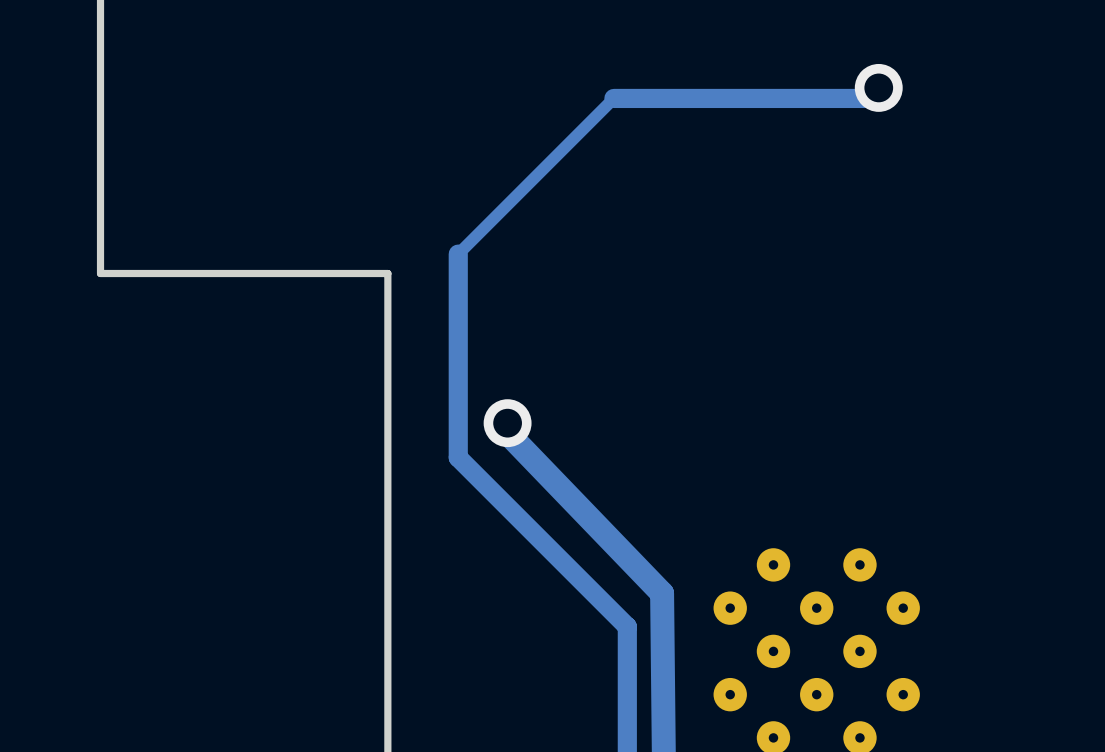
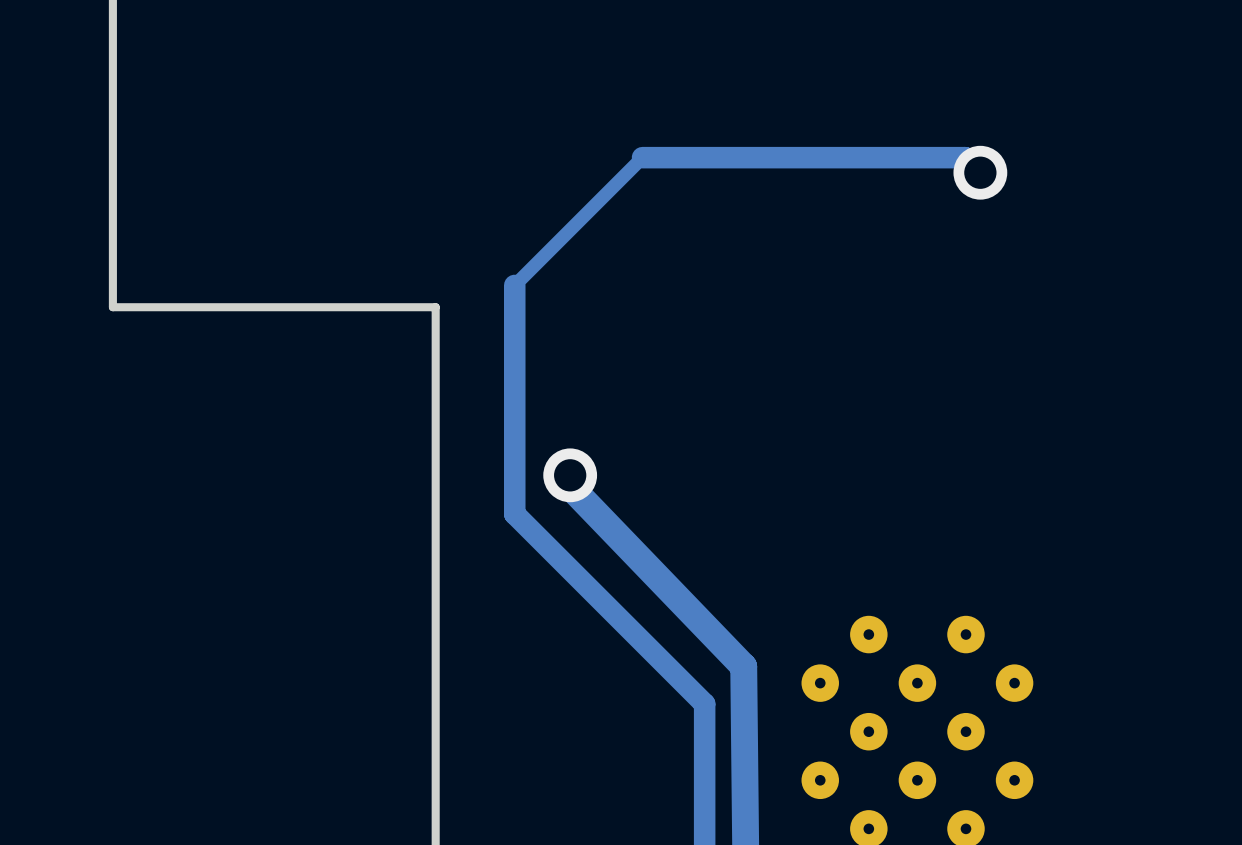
track: (878, 87) (868, 98) (613, 98) (572, 140) -> (980, 172) (965, 157) (642, 157)
via position: (878, 87) -> (980, 172)

